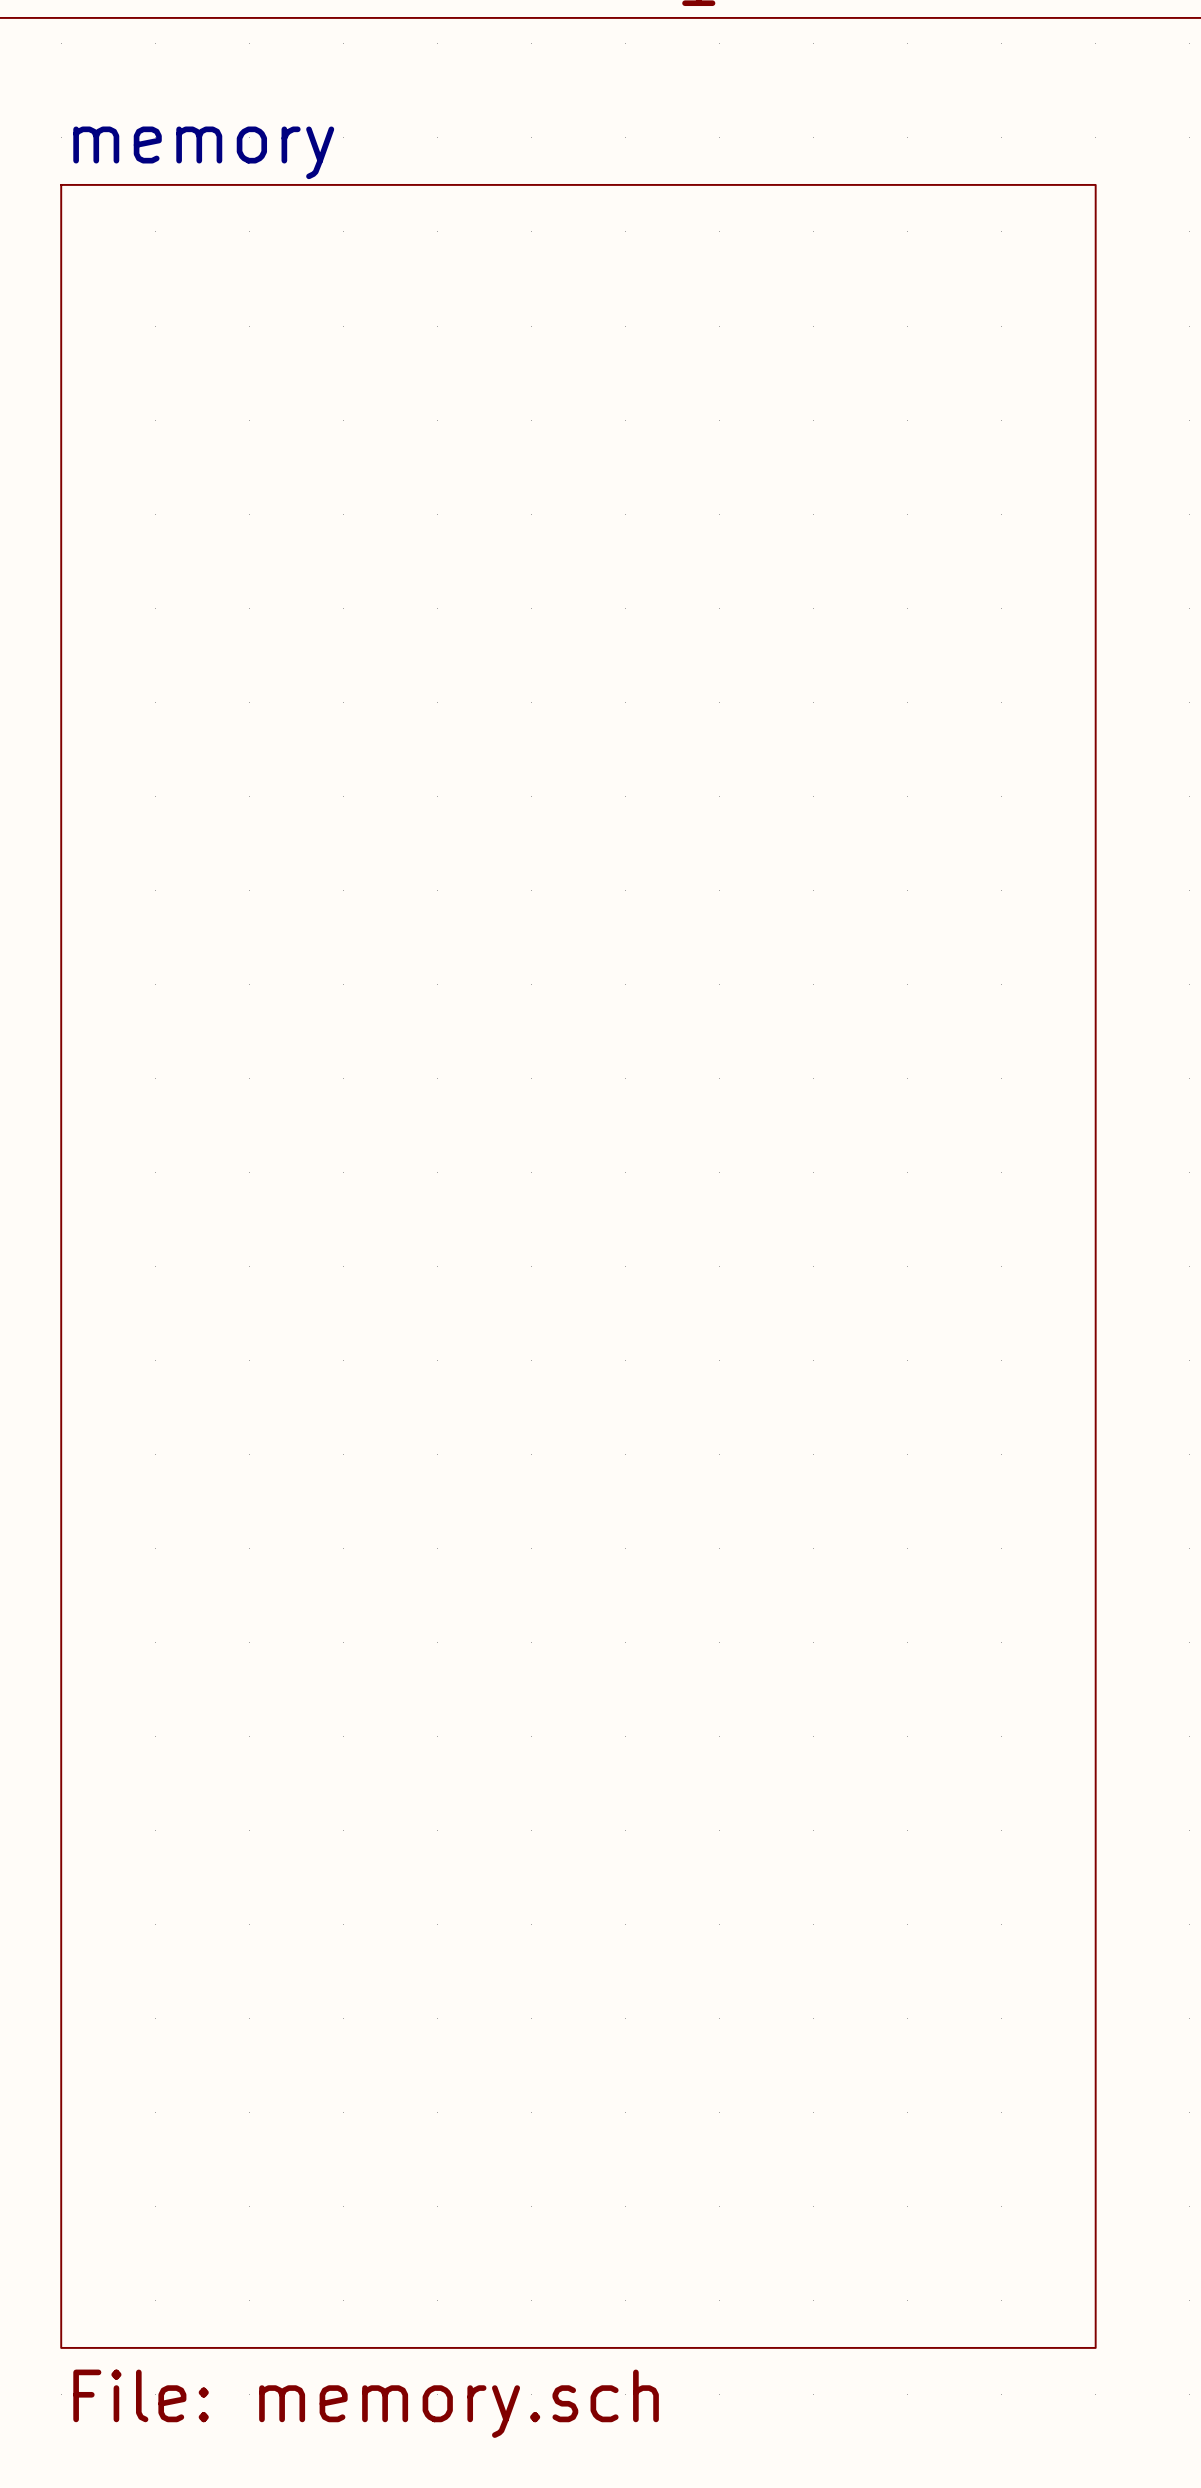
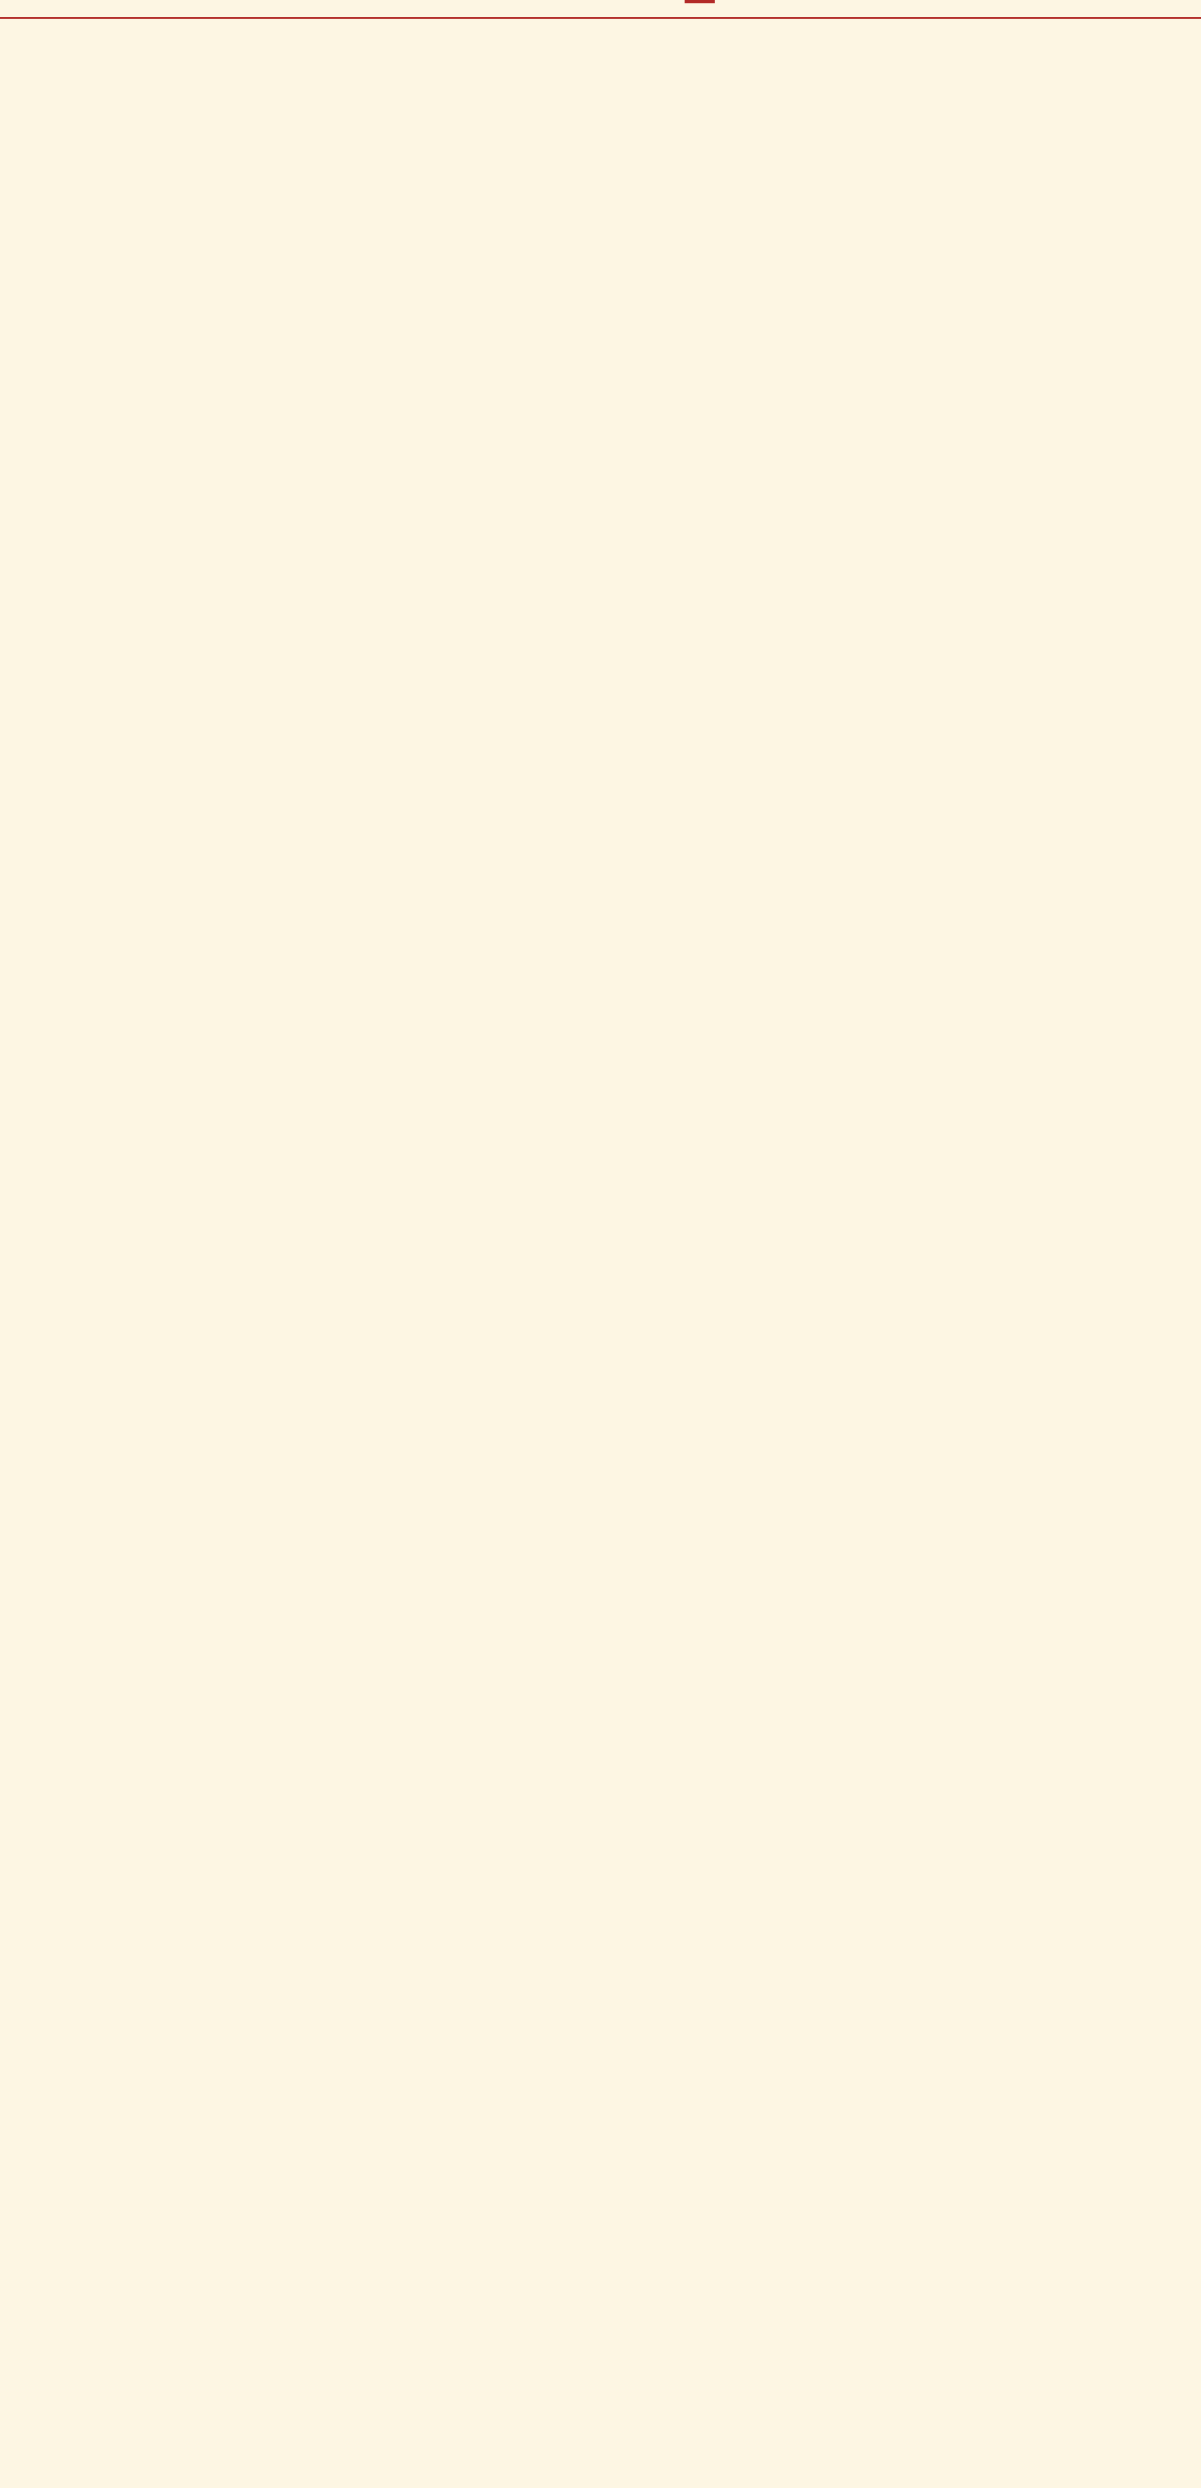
sheet memory: File: memory.sch (578, 1266) -> none

